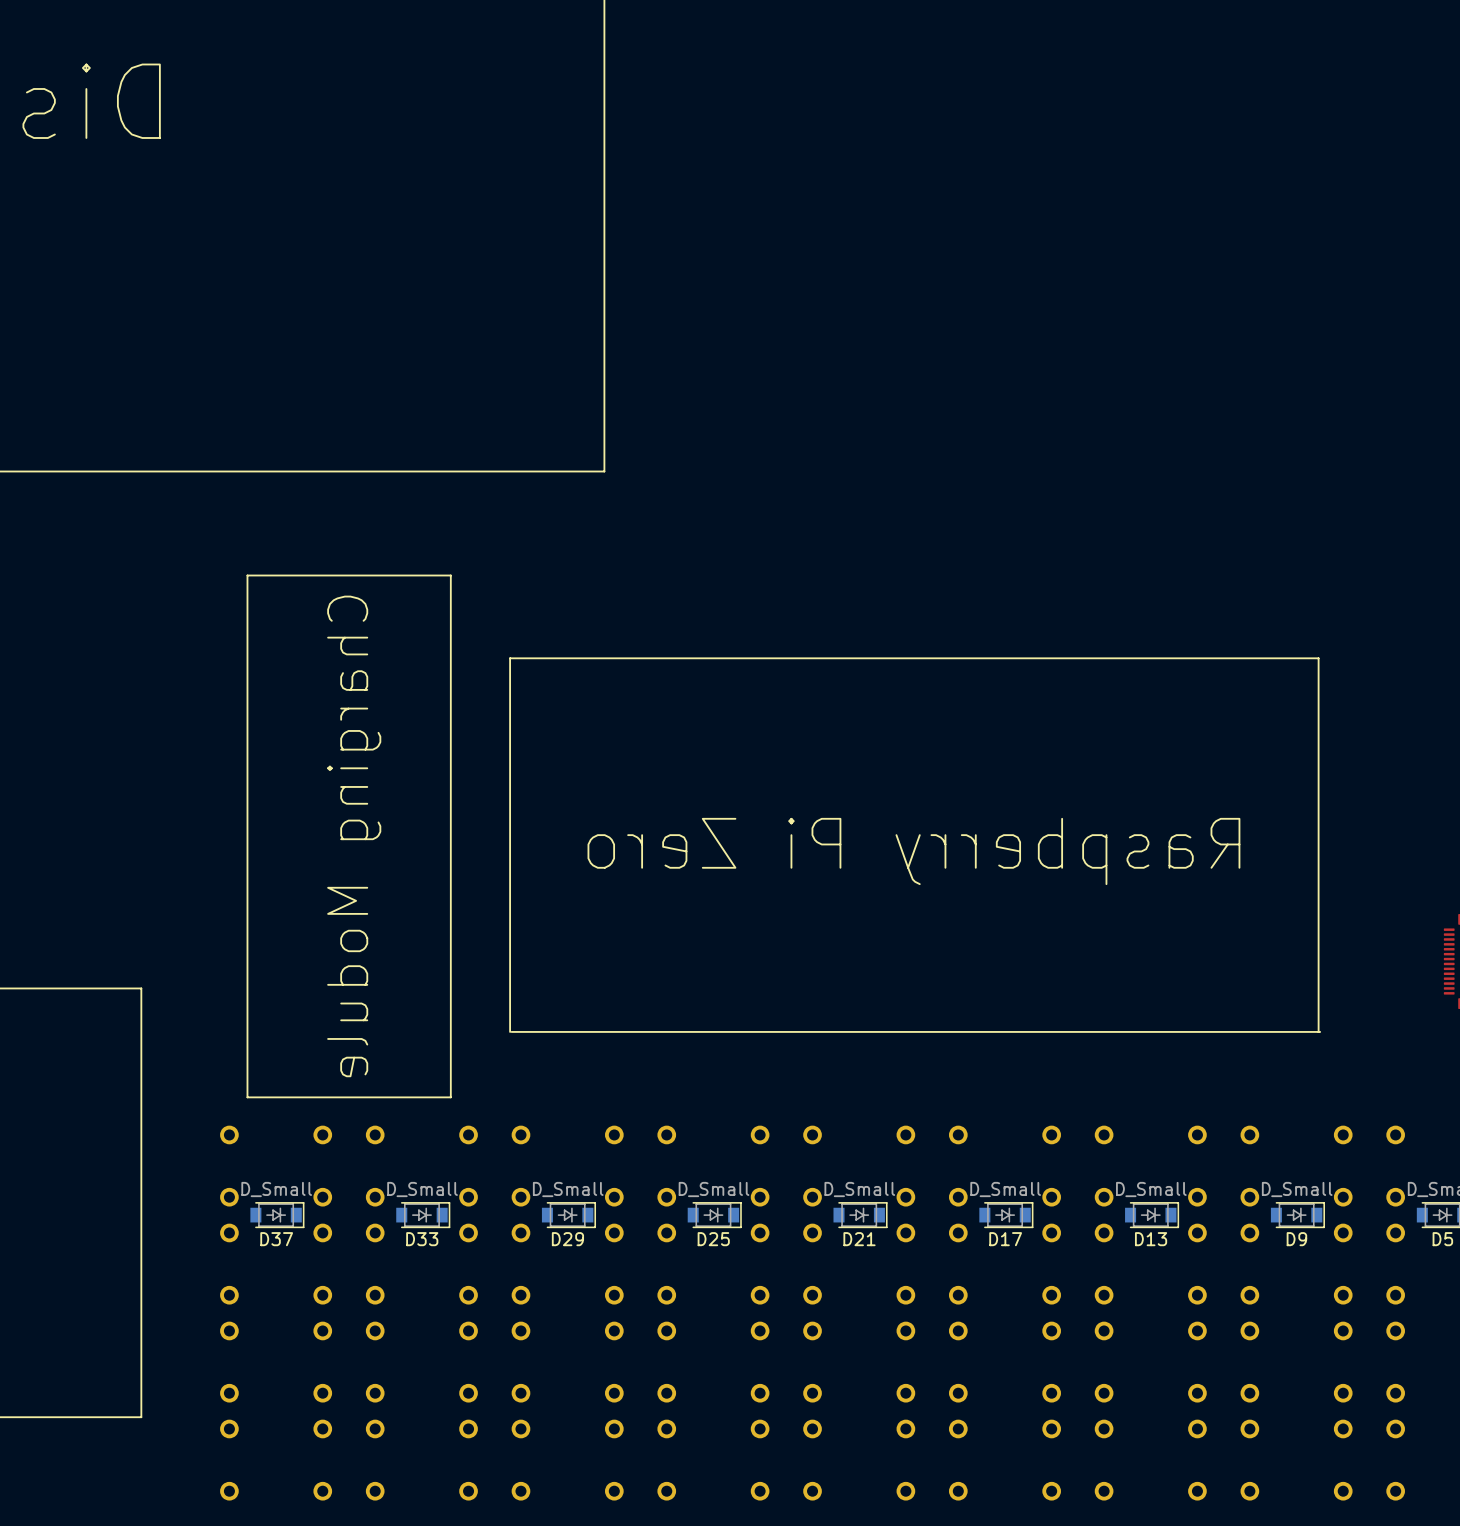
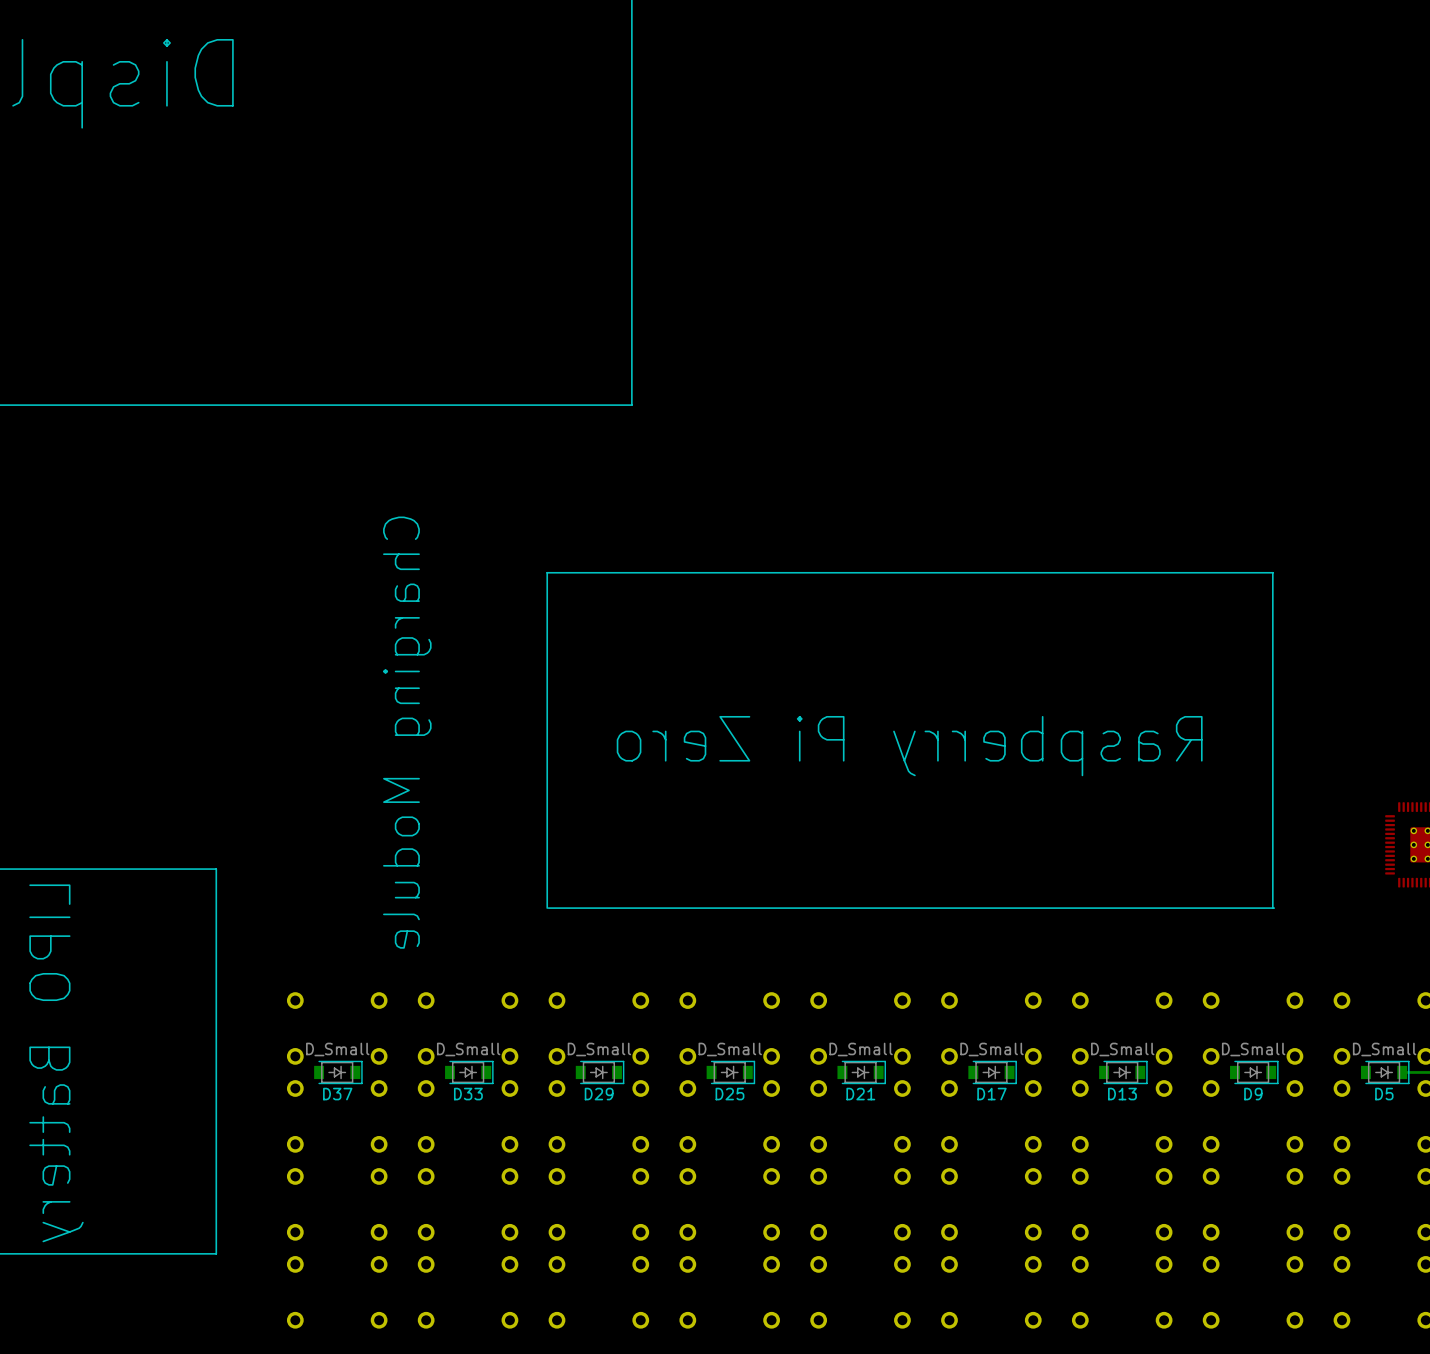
line: (450, 575) (450, 1097) (247, 1097) (247, 575) (450, 575) -> none

